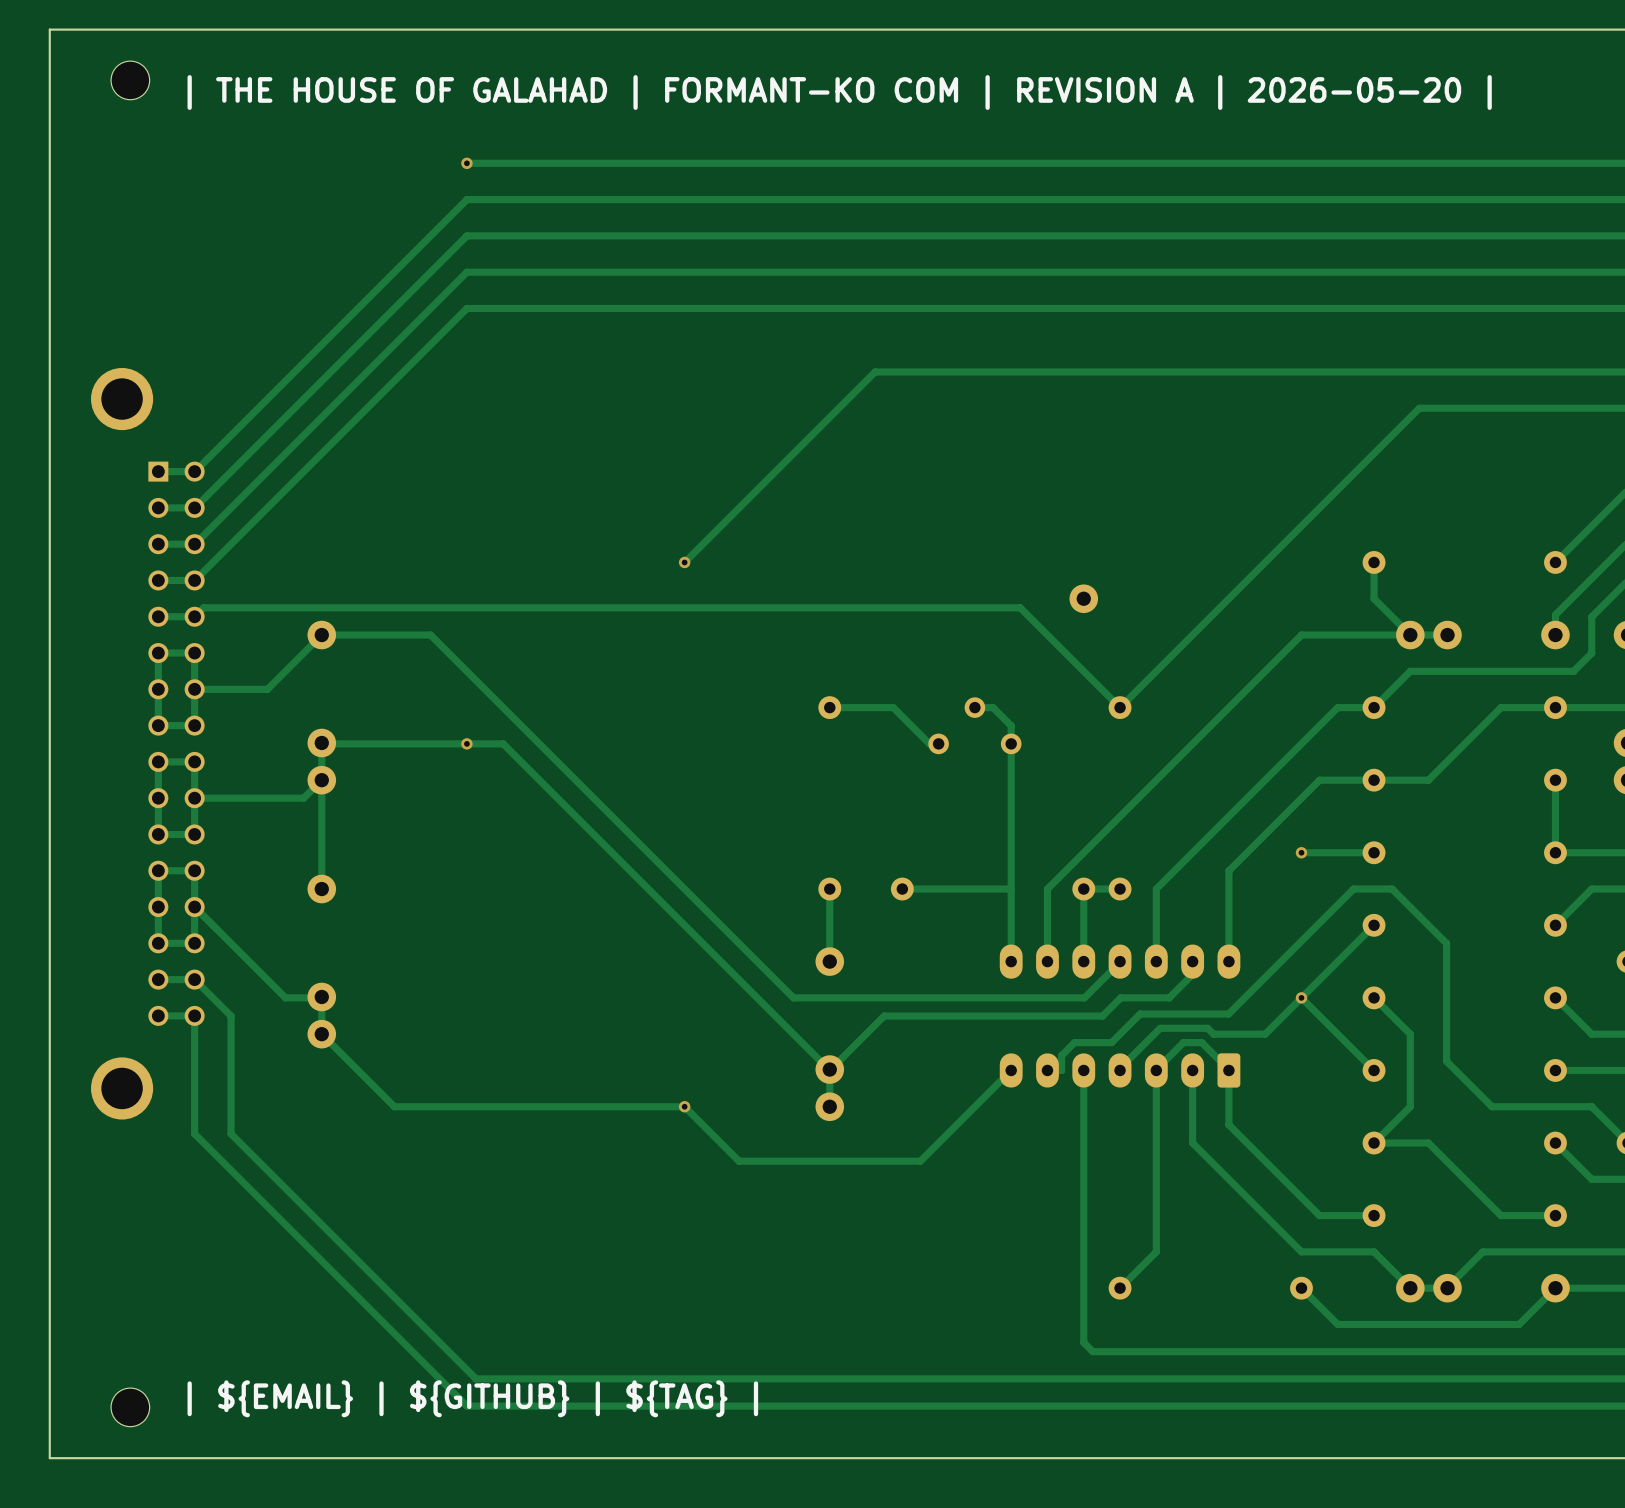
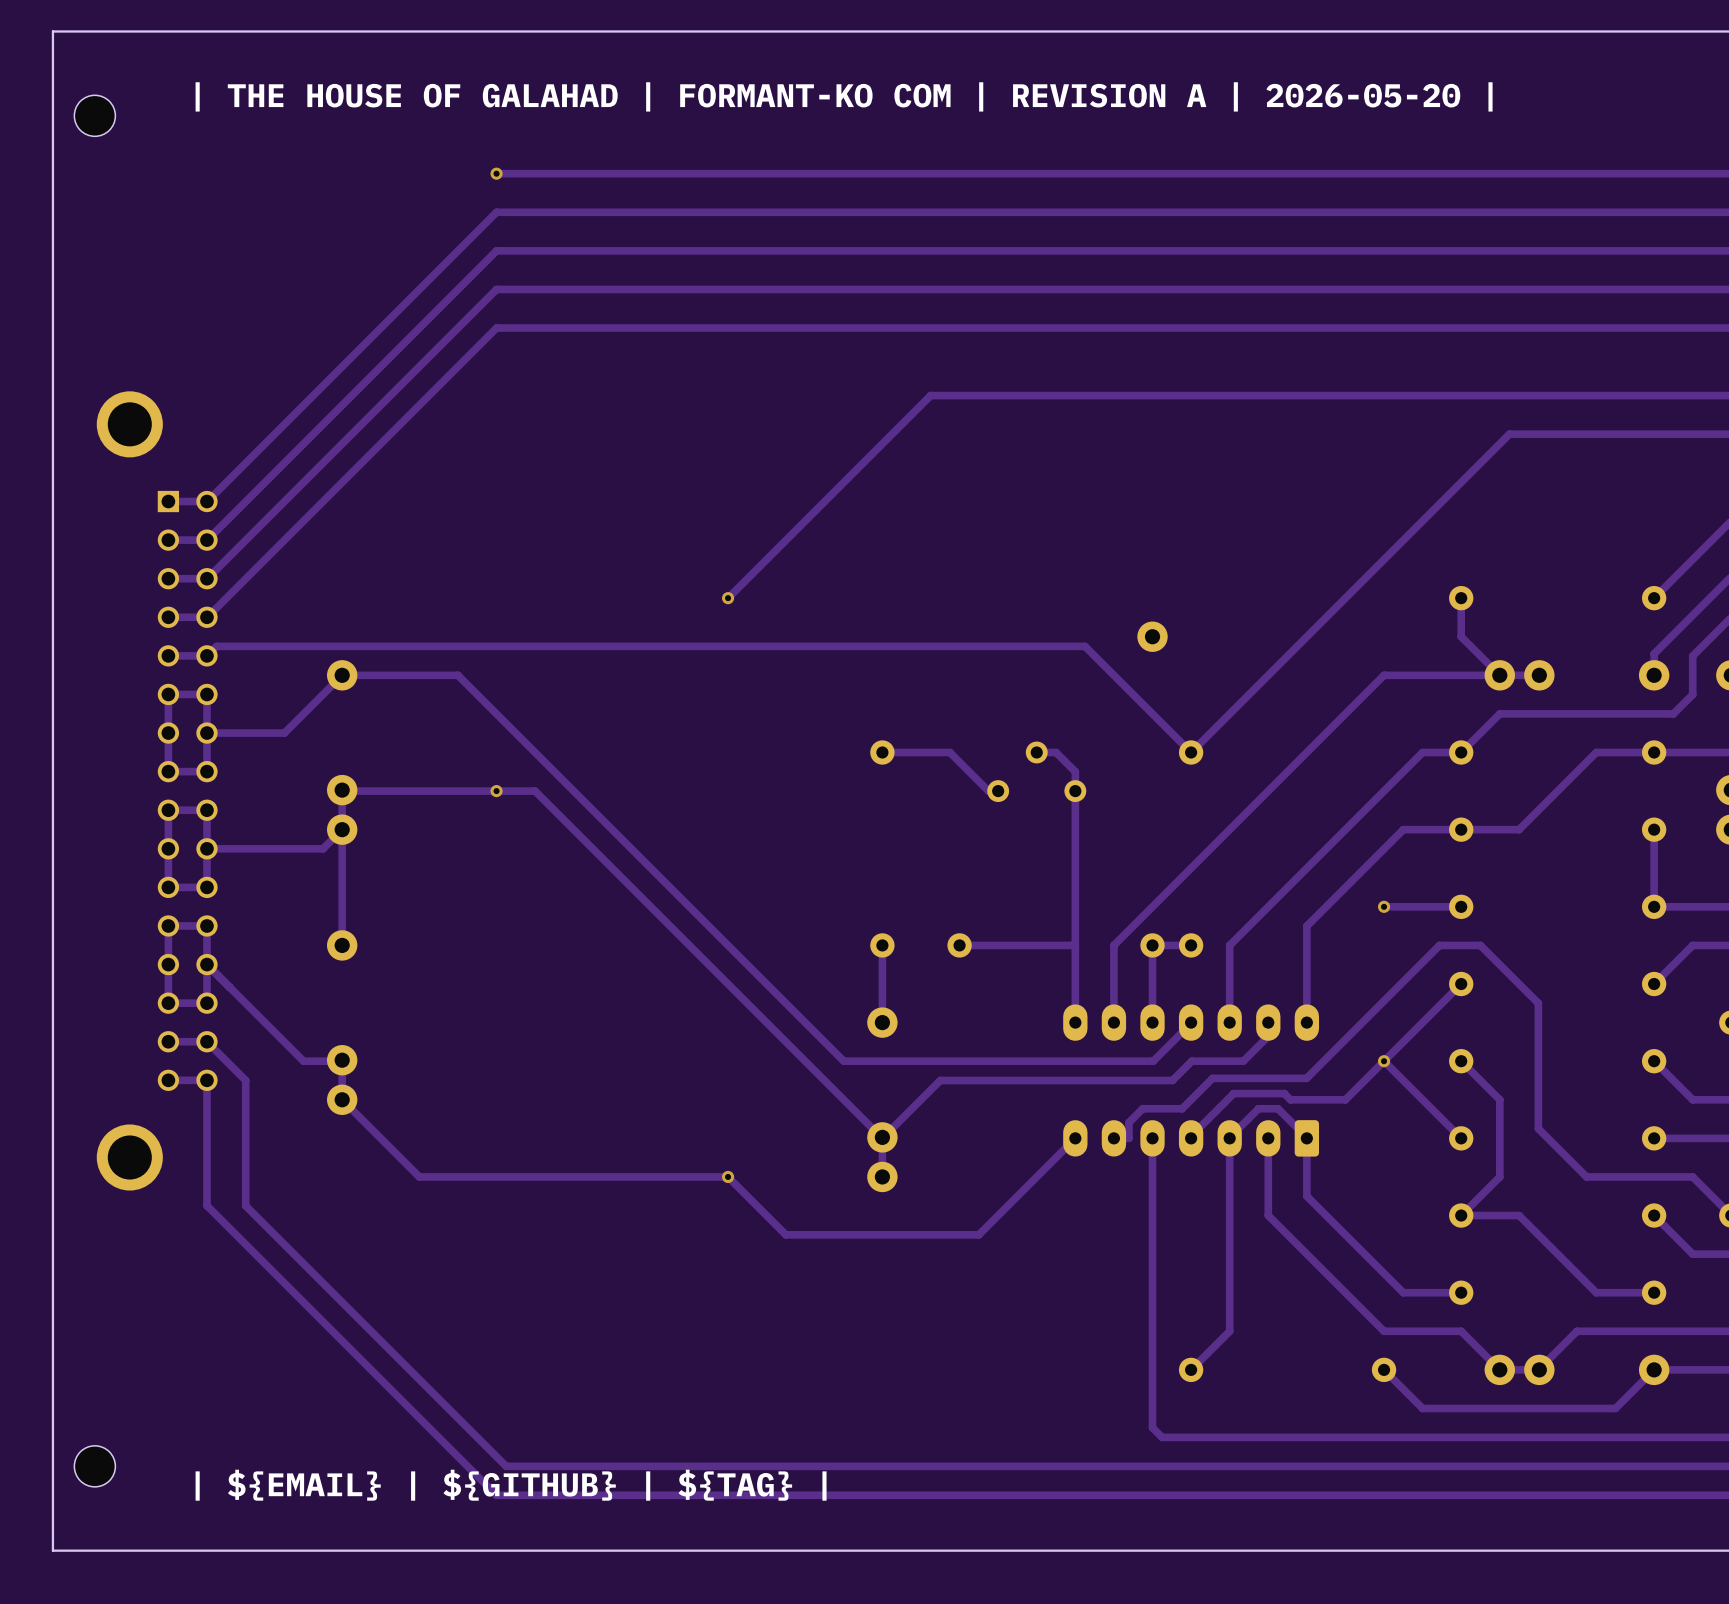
part position: (130, 80) -> (94, 115)
part position: (130, 1407) -> (94, 1466)

